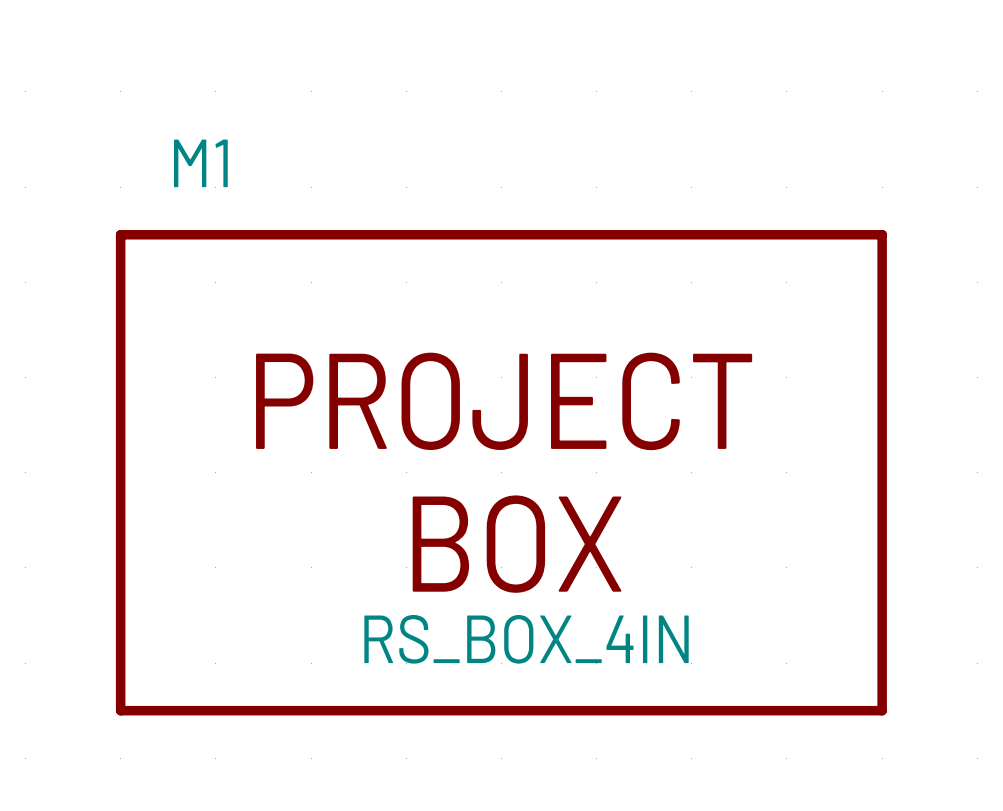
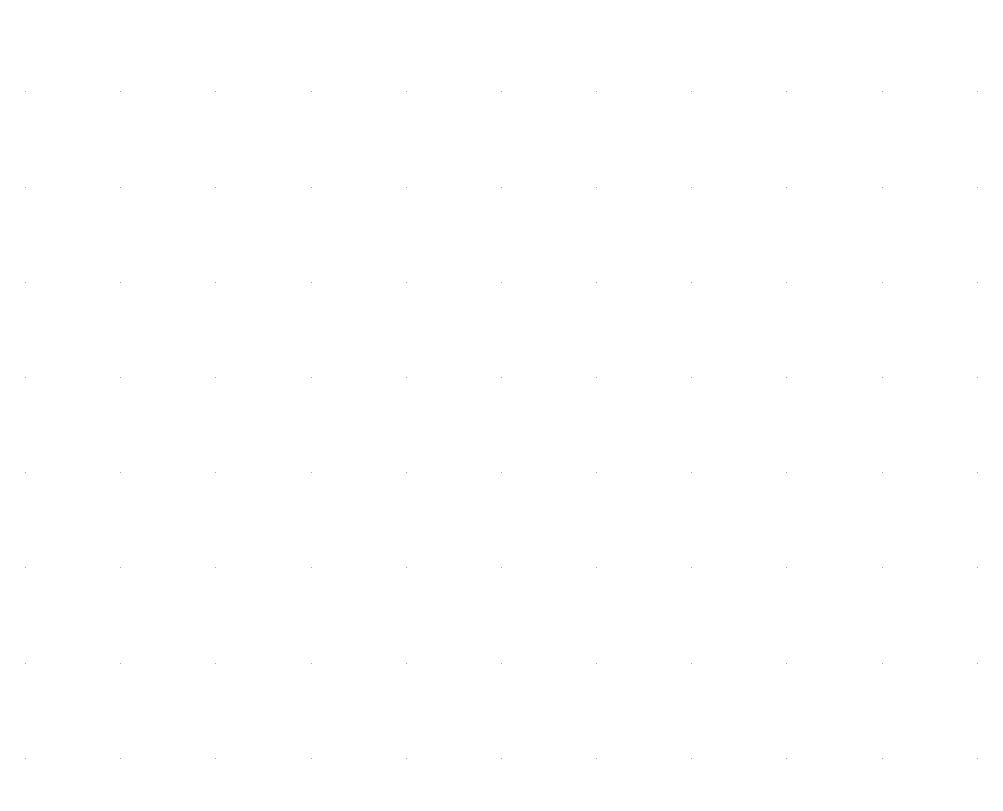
M1: RS_BOX_4IN (501, 472) -> none

